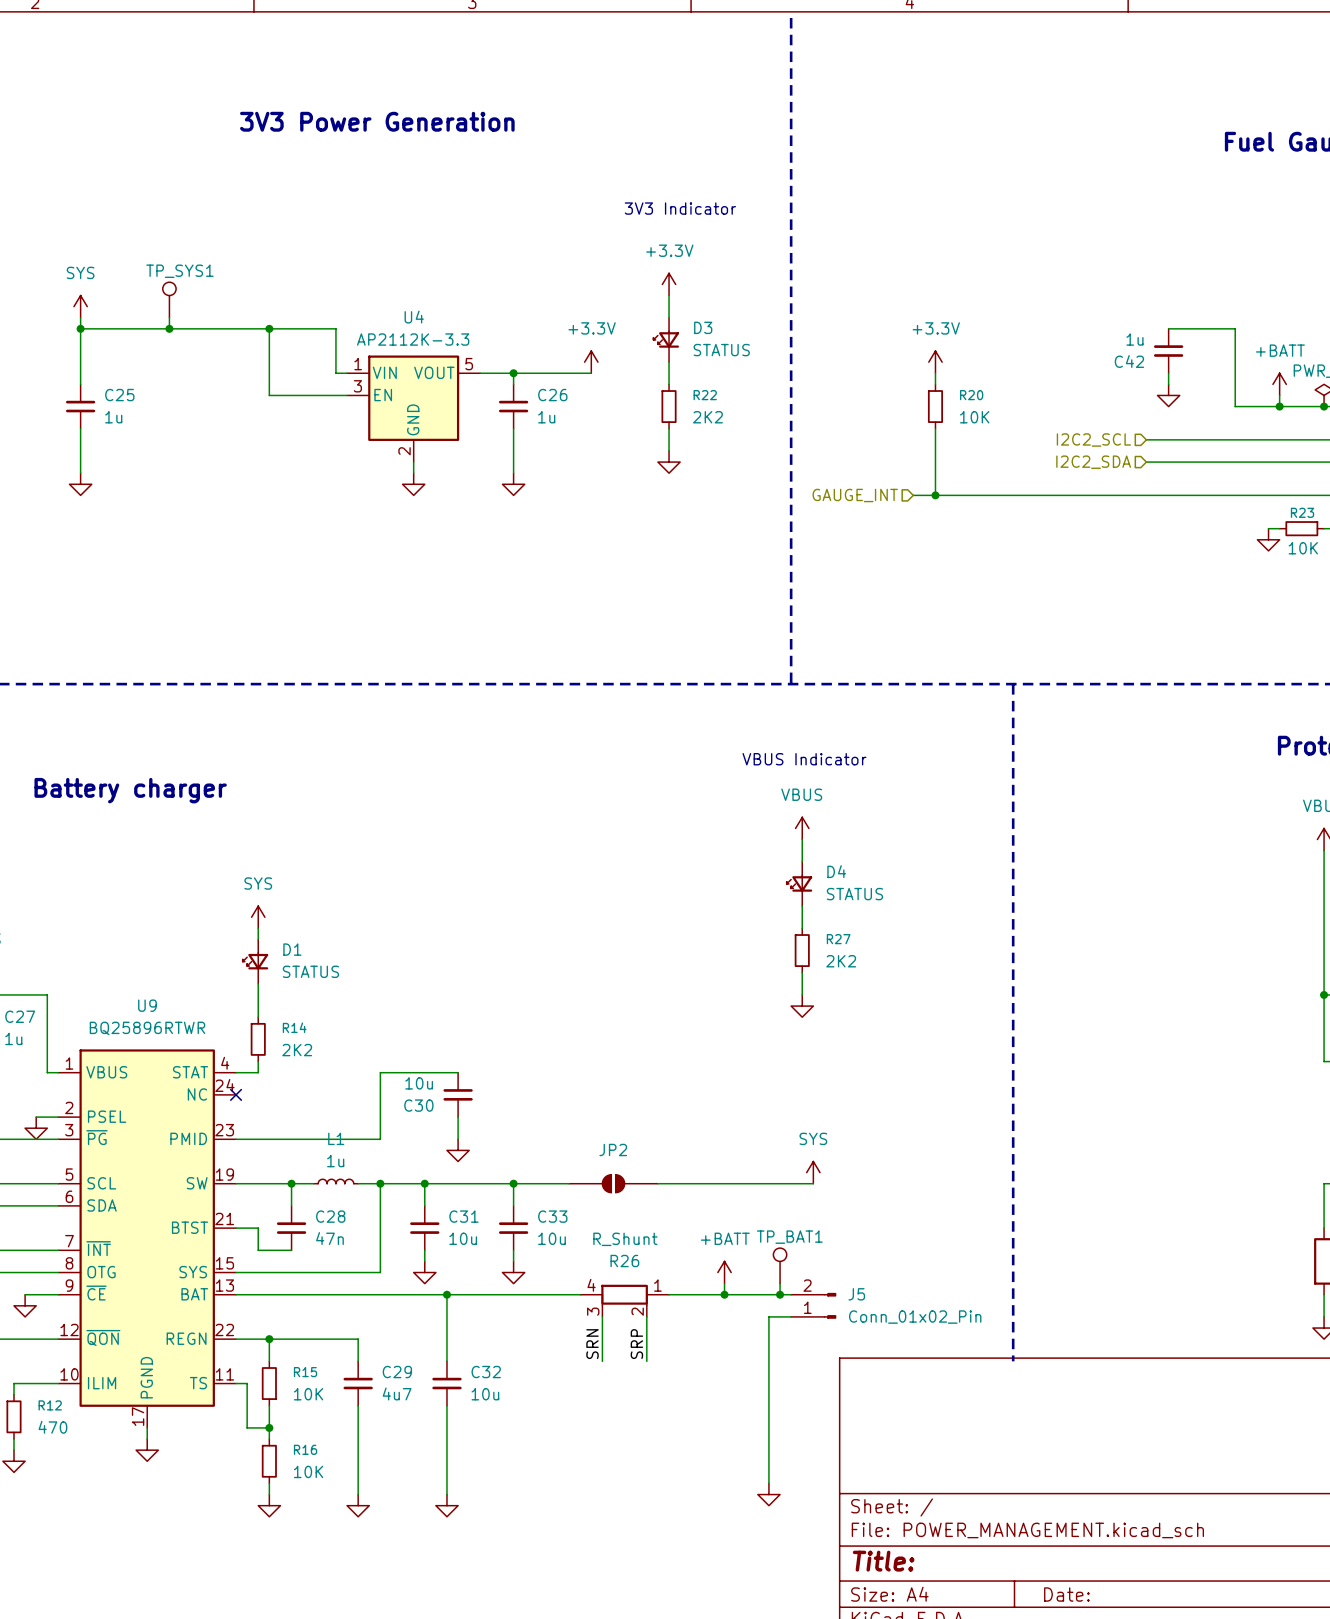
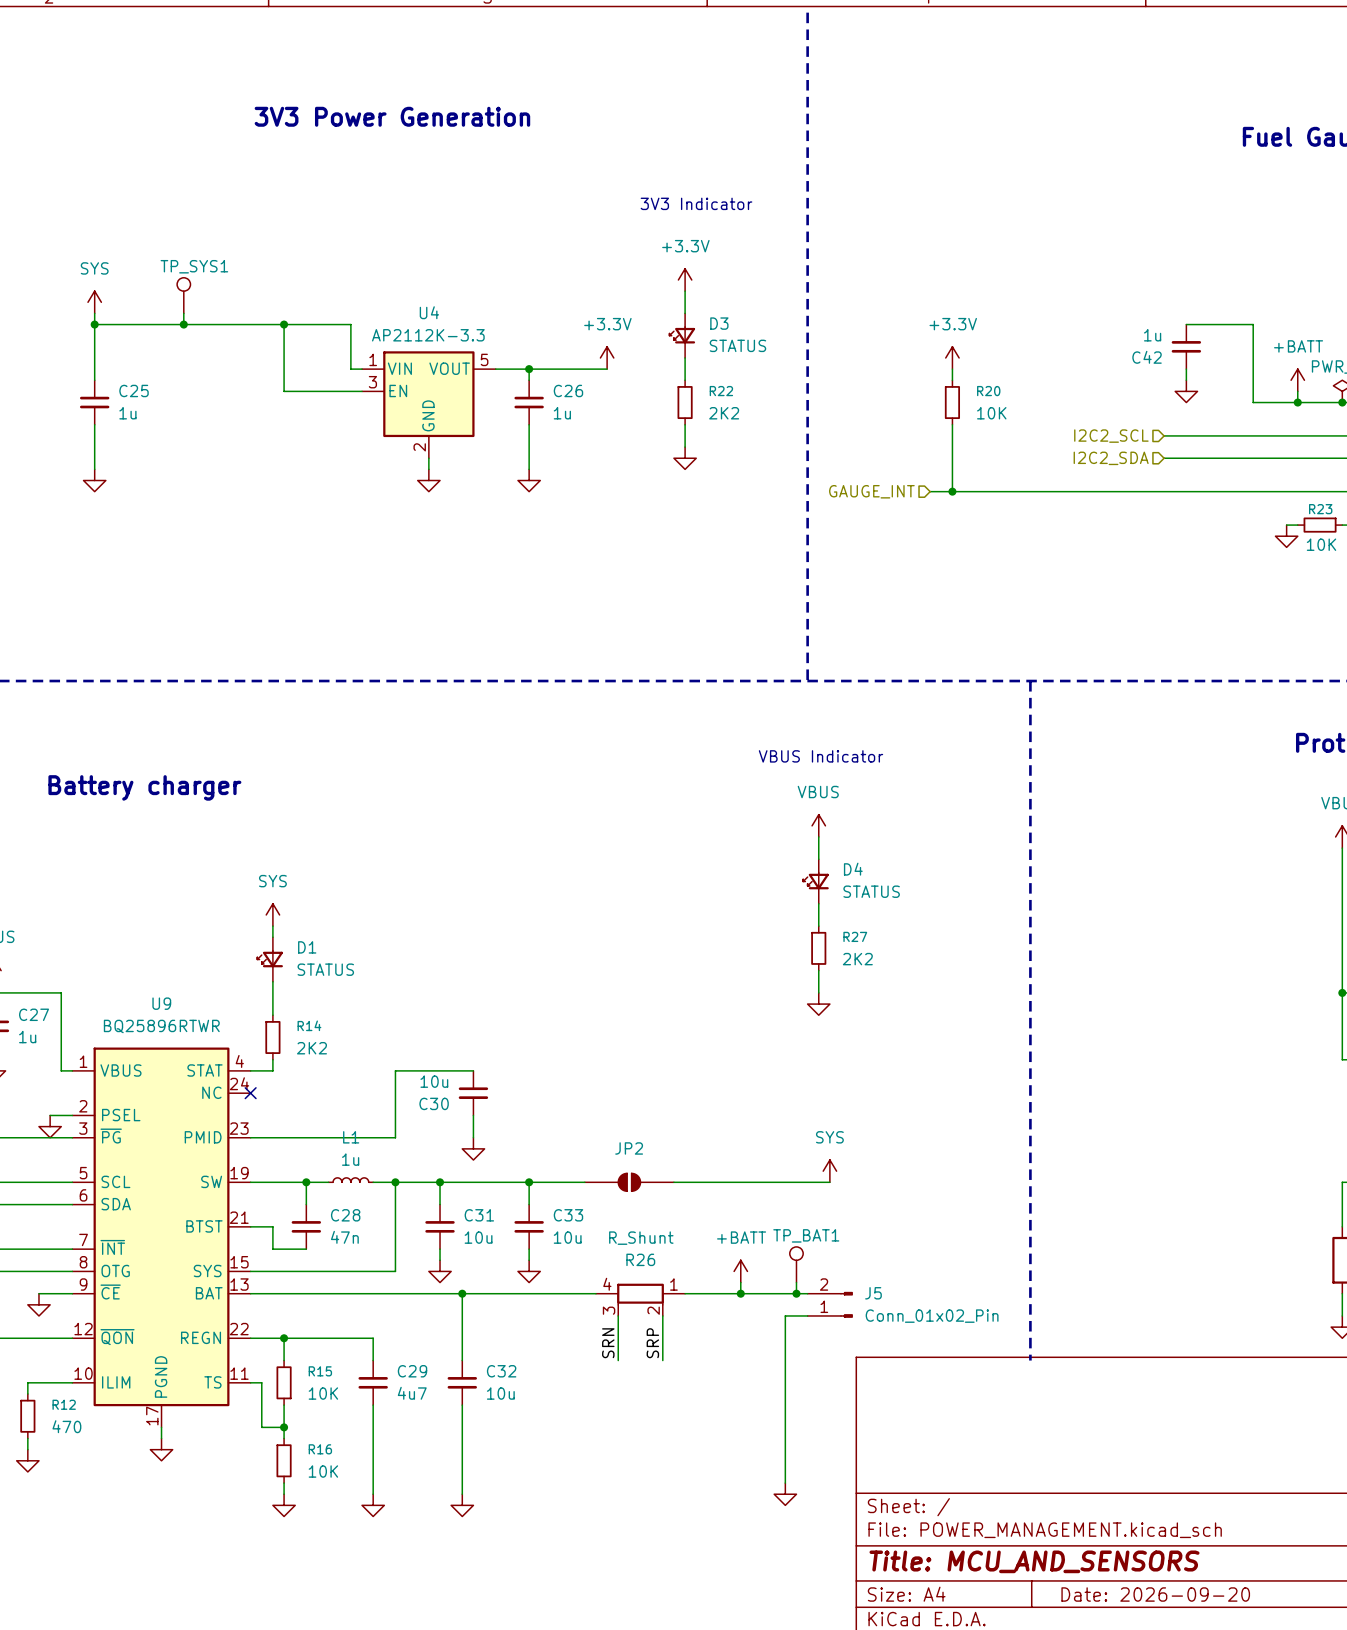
title block: Title: (883, 1561) -> Title: MCU_AND_SENSORS (1034, 1561)
title block: Date: (1066, 1594) -> Date: 2026-09-20 (1155, 1594)

